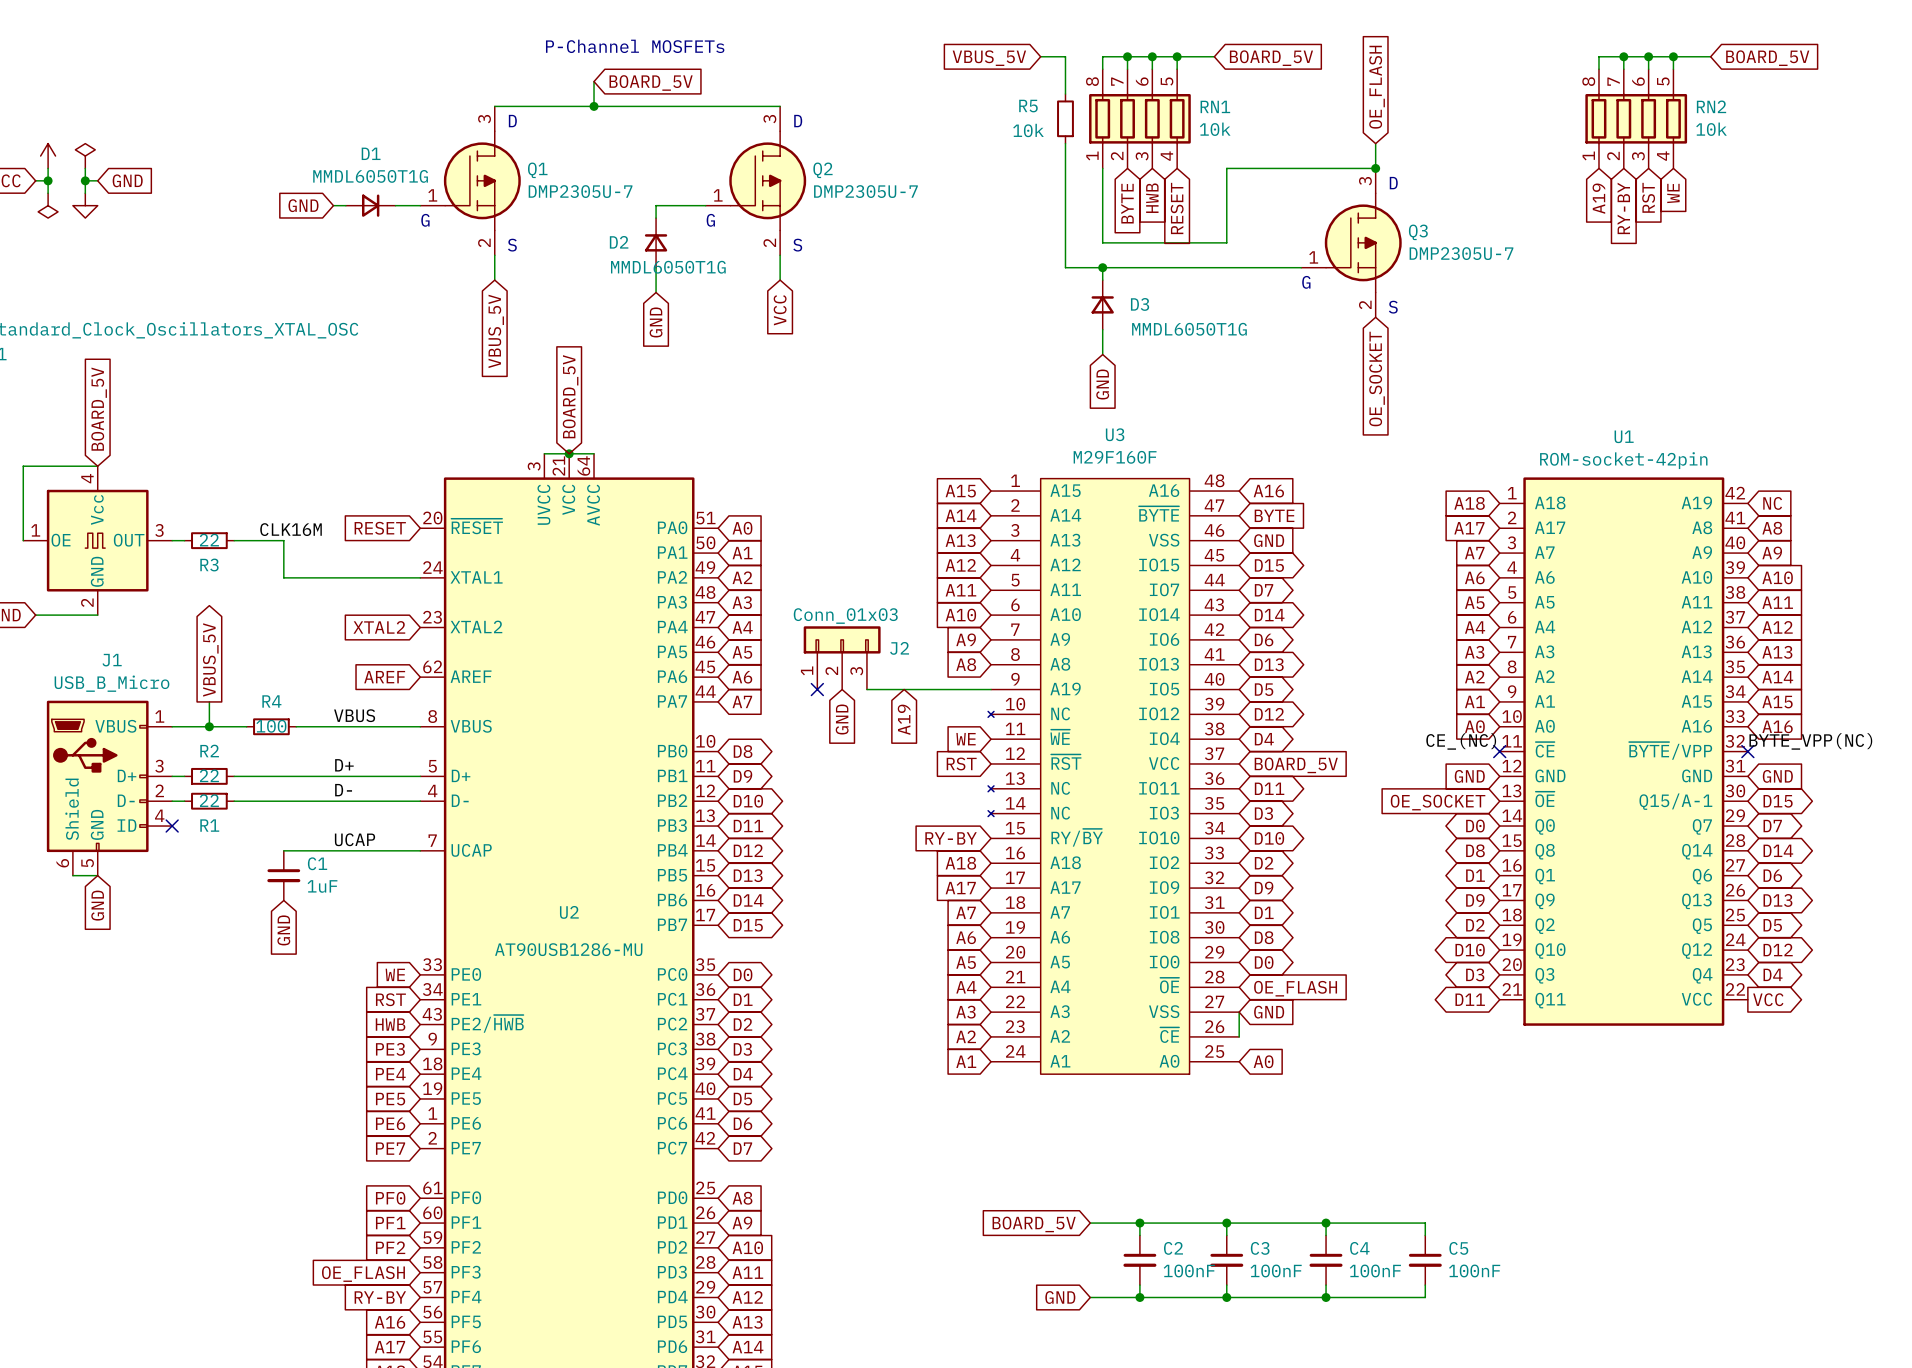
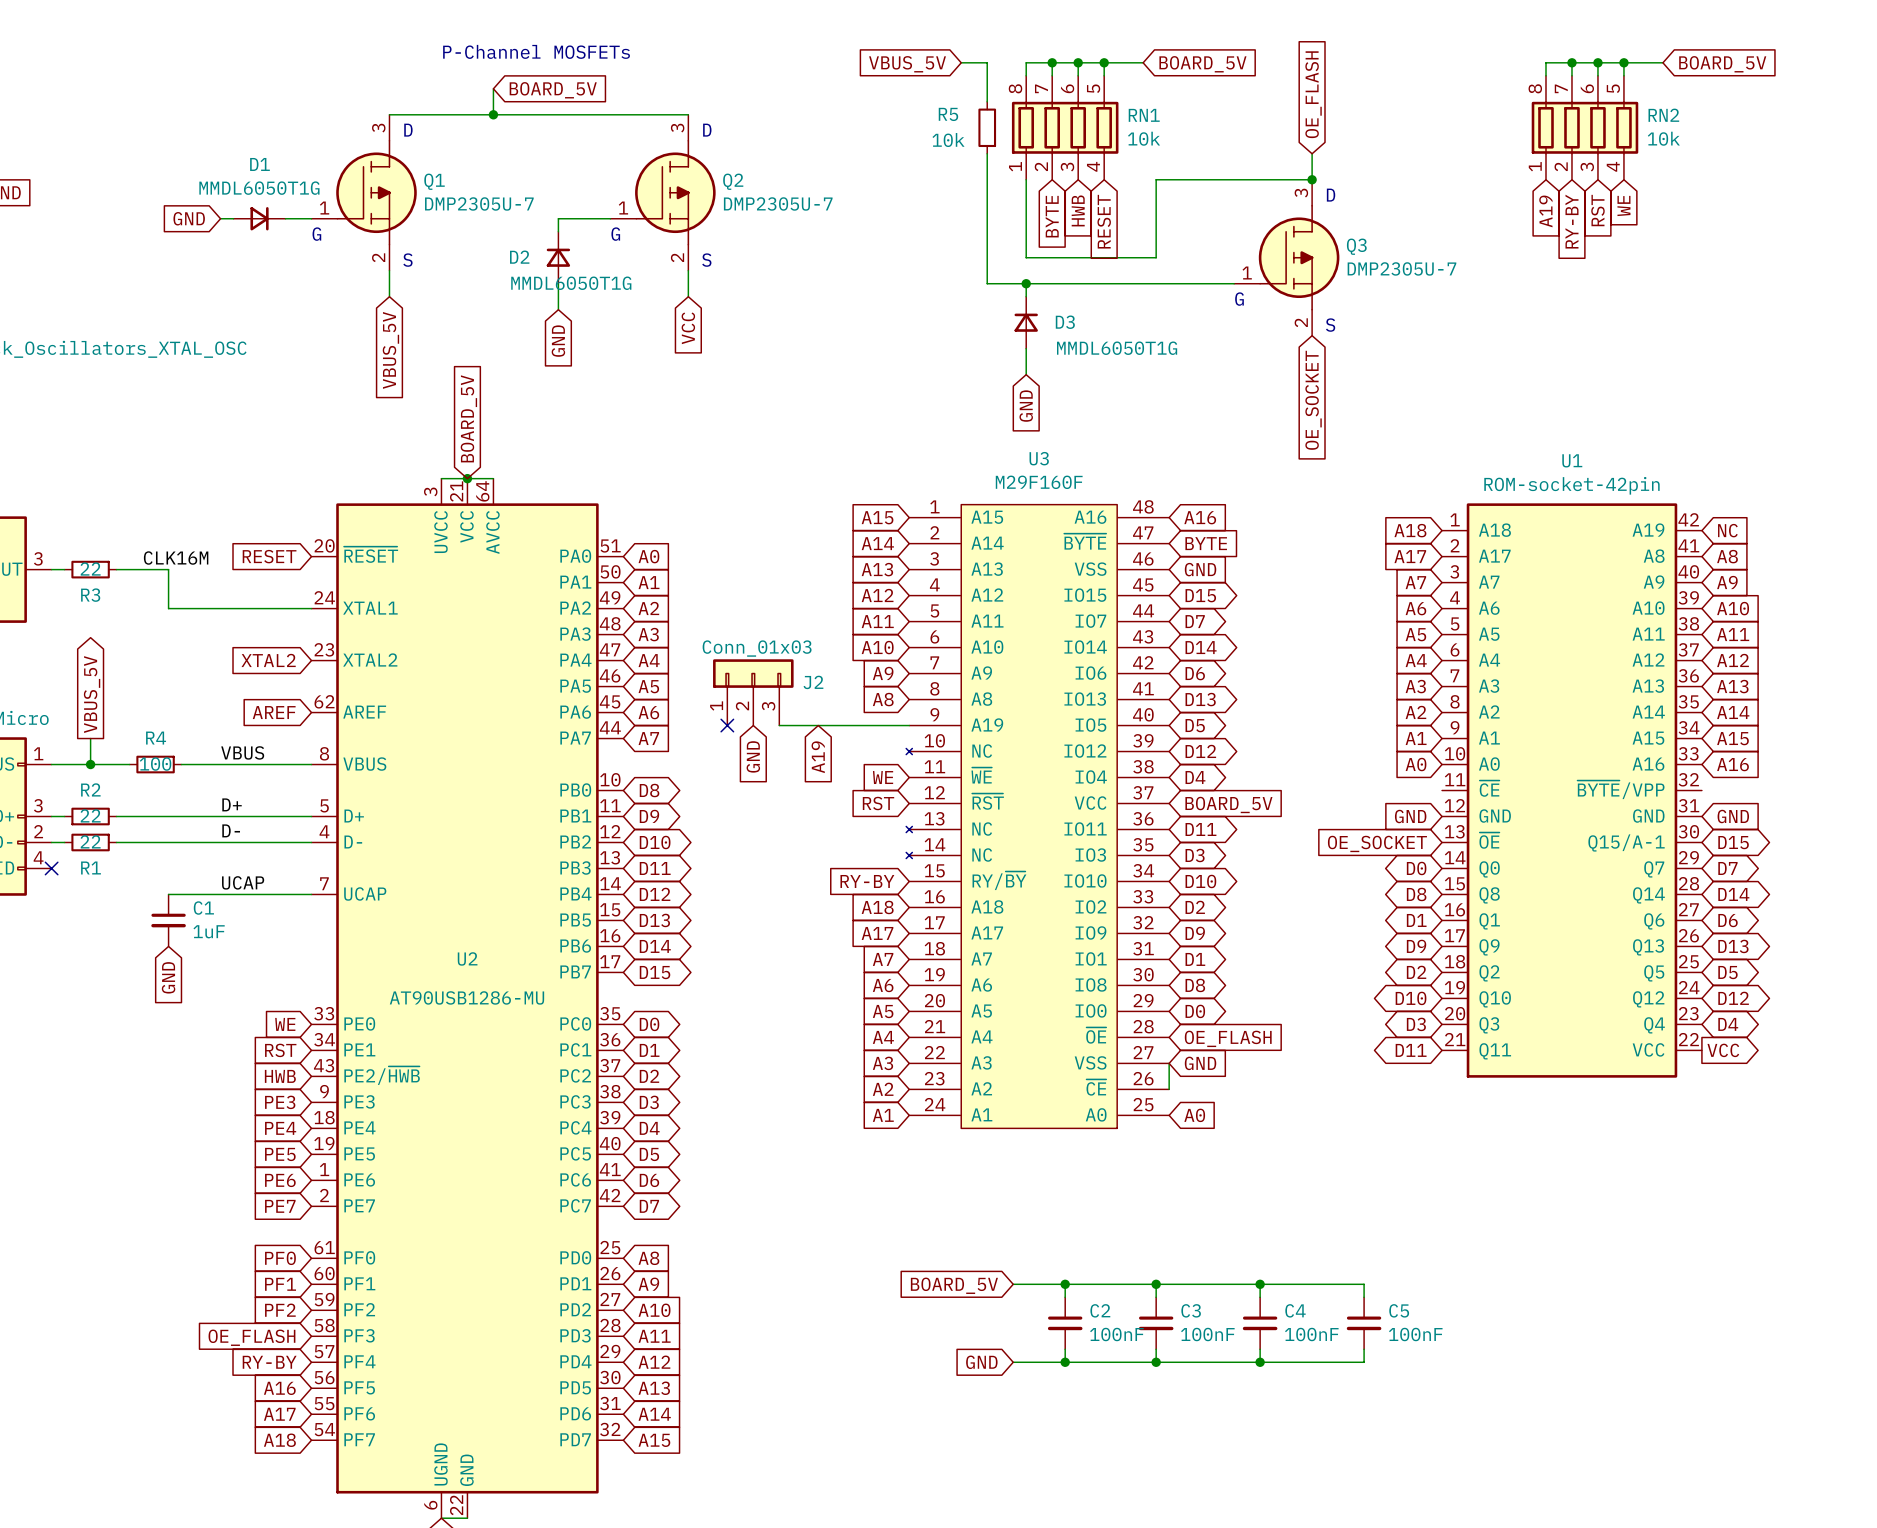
label: CE_(NC) (1461, 741) -> none
label: BYTE_VPP(NC) (1810, 741) -> none
no-connect mark: (1499, 751) -> none
no-connect mark: (1747, 751) -> none

